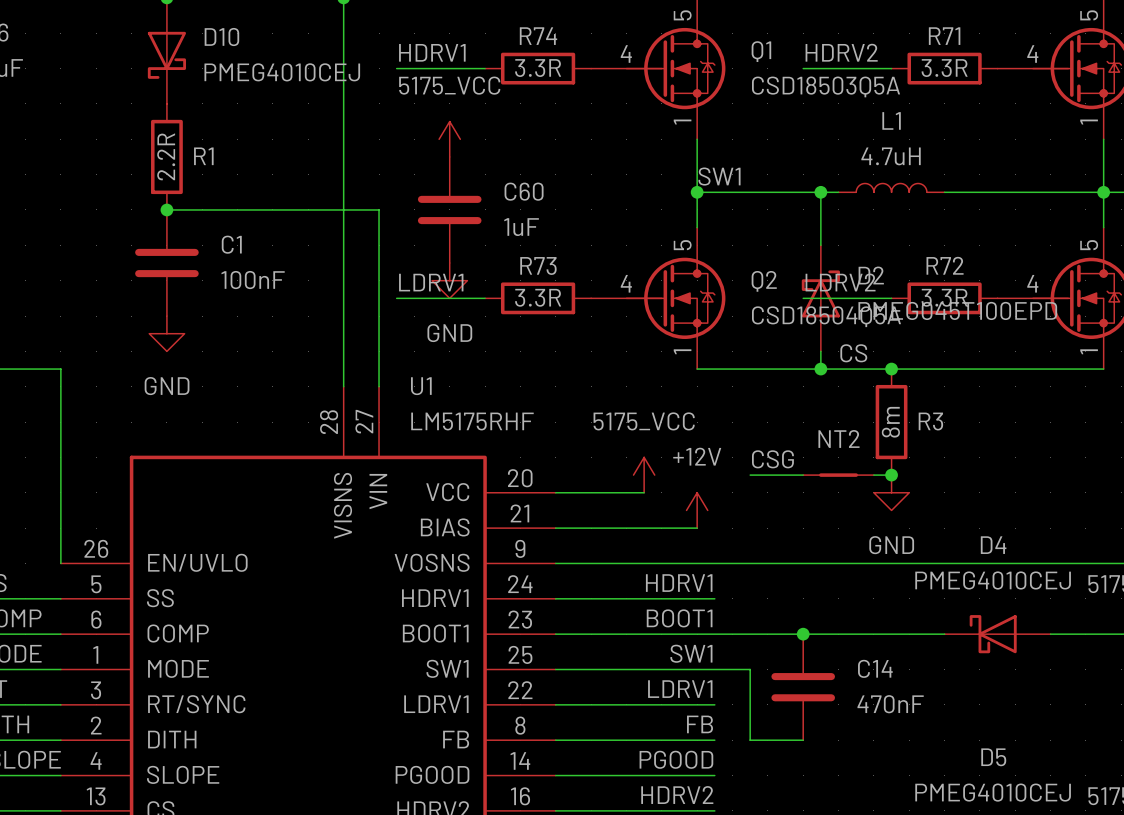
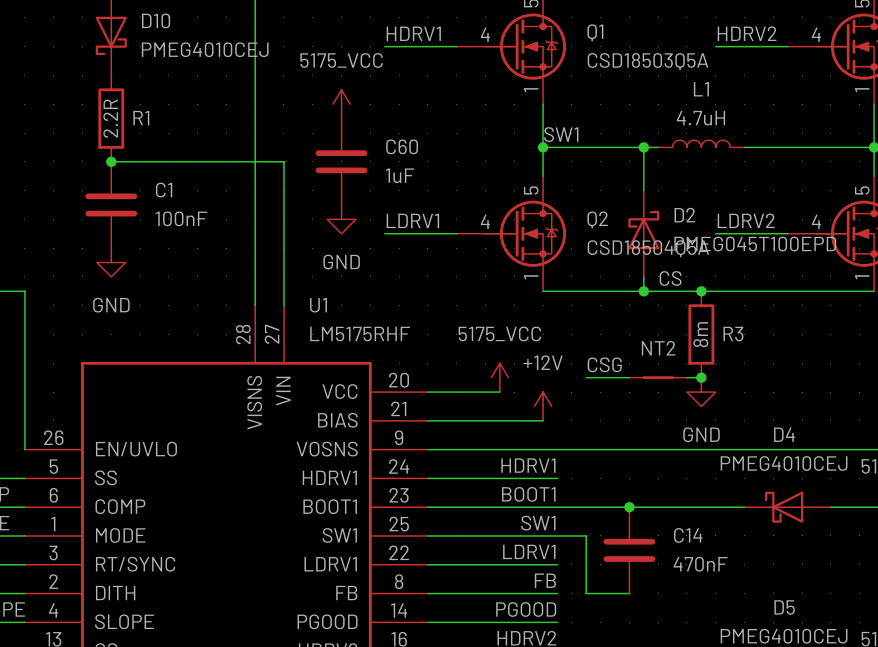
label position: HDRV1 (432, 52) -> HDRV1 (413, 33)
label position: HDRV2 (841, 52) -> HDRV2 (747, 33)
wire: (396, 68) (485, 68) -> (384, 46) (456, 46)
R74: 3.3R (538, 68) -> none
wire: (803, 68) (891, 68) -> (715, 46) (787, 46)
R71: 3.3R (944, 68) -> none
label position: LDRV1 (431, 282) -> LDRV1 (412, 220)
label position: LDRV2 (840, 282) -> LDRV2 (746, 220)
wire: (396, 298) (485, 298) -> (384, 233) (456, 233)
R73: 3.3R (538, 298) -> none
wire: (803, 298) (891, 298) -> (715, 233) (787, 233)
R72: 3.3R (944, 298) -> none

